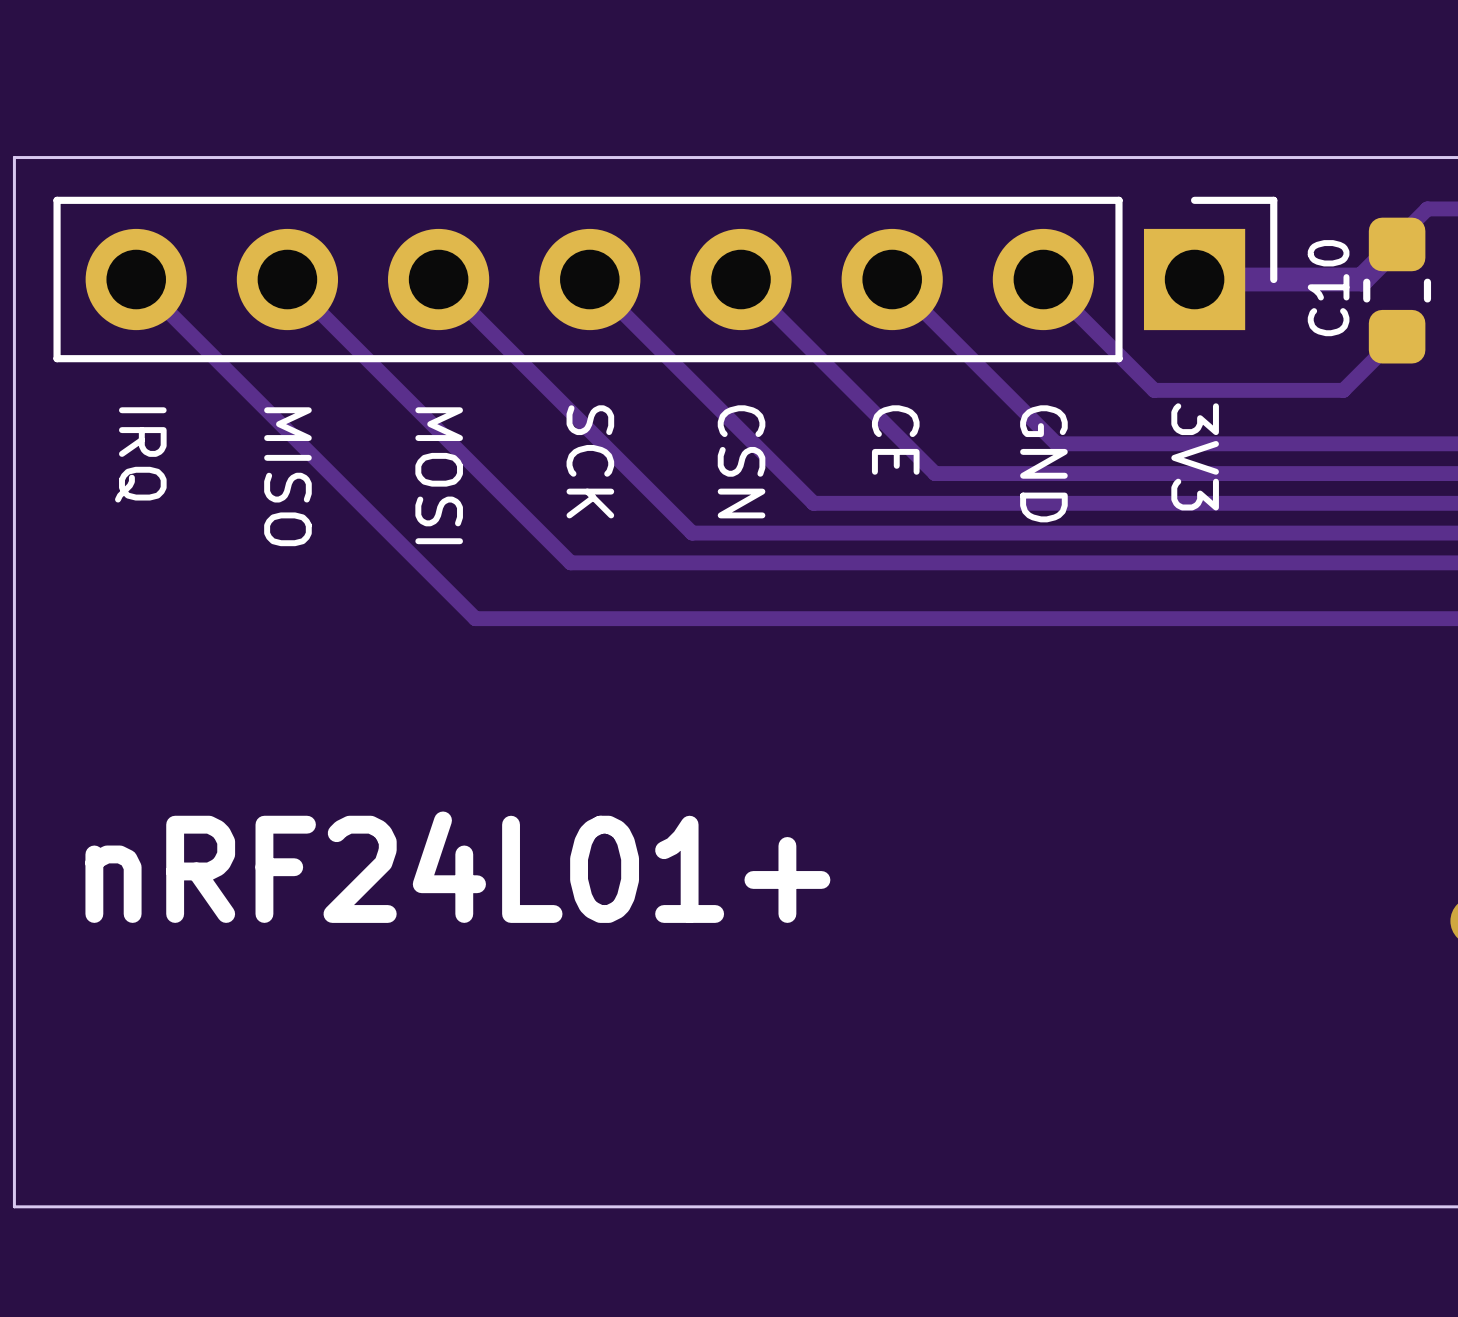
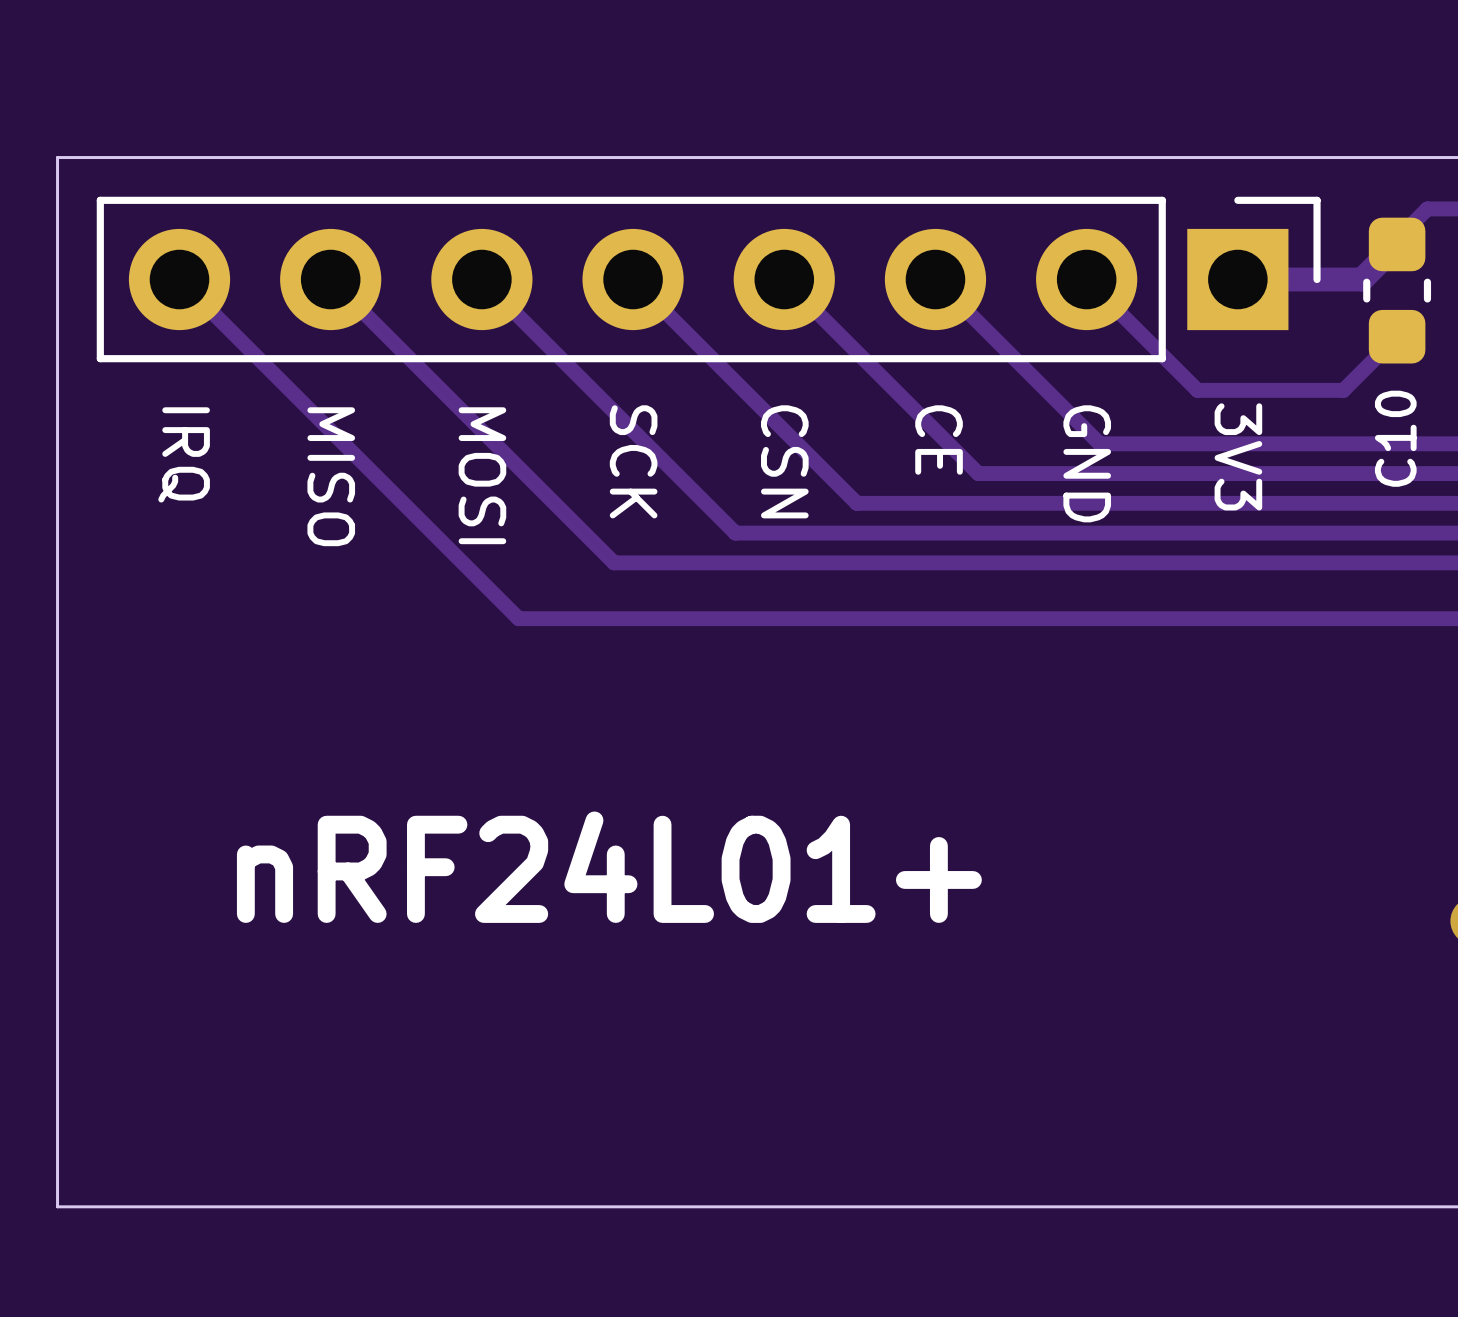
board edge: (57, 157) (14, 157) (14, 1206) (57, 1206) -> (57, 157) (57, 1206)
track: (136, 279) (475, 618) (518, 618) -> (179, 279) (518, 618)
track: (287, 279) (570, 562) (614, 562) -> (330, 279) (614, 562)
track: (438, 279) (692, 533) (735, 533) -> (481, 279) (735, 533)
track: (589, 279) (813, 503) (856, 503) -> (633, 279) (856, 503)
part position: (665, 279) -> (708, 279)
track: (741, 279) (935, 473) (978, 473) -> (784, 279) (978, 473)
track: (892, 279) (1056, 443) (1099, 443) -> (935, 279) (1099, 443)
track: (1043, 279) (1154, 390) (1197, 390) -> (1086, 279) (1197, 390)
C10 name position: C10 (1328, 288) -> C10 (1395, 438)
text position: CE (895, 440) -> CE (939, 440)
text position: IRQ (140, 454) -> IRQ (184, 454)
text position: 3V3 (1195, 456) -> 3V3 (1238, 456)
text position: SCK (590, 461) -> SCK (633, 461)
text position: CSN (741, 461) -> CSN (784, 461)
text position: GND (1043, 463) -> GND (1087, 463)
text position: MOSI (439, 475) -> MOSI (482, 475)
text position: MISO (287, 476) -> MISO (331, 476)
text position: nRF24L01+ (457, 867) -> nRF24L01+ (609, 867)

